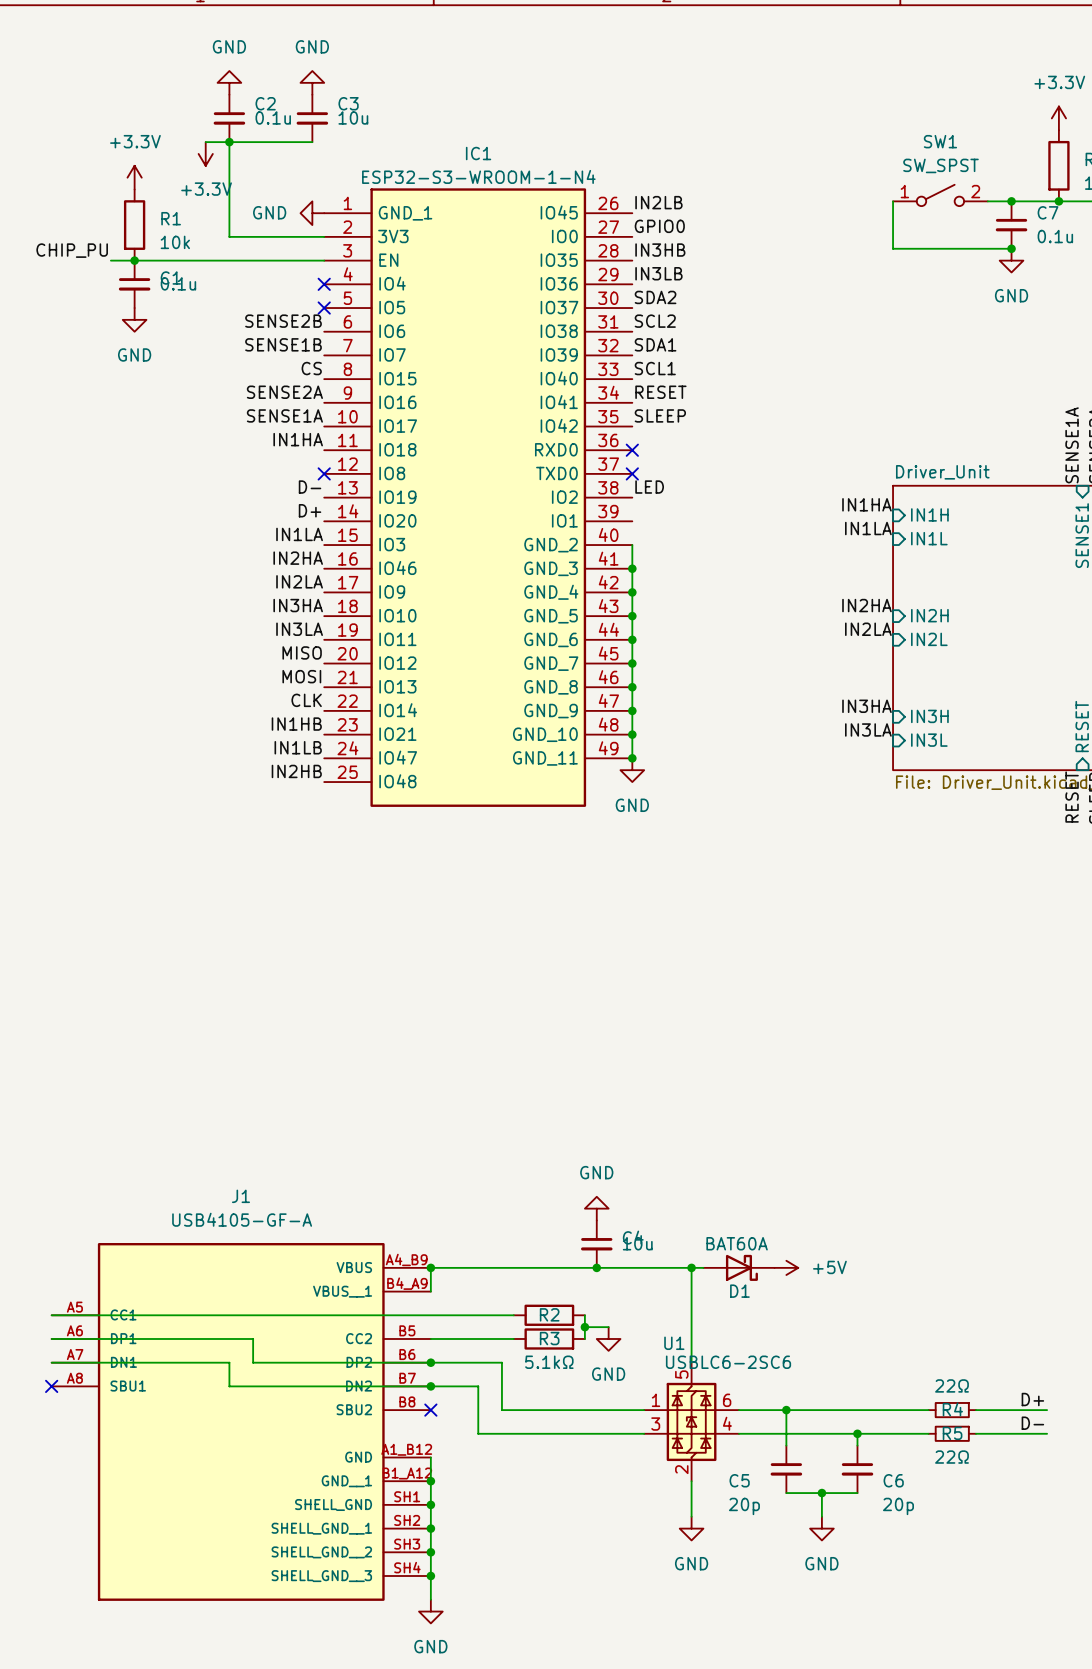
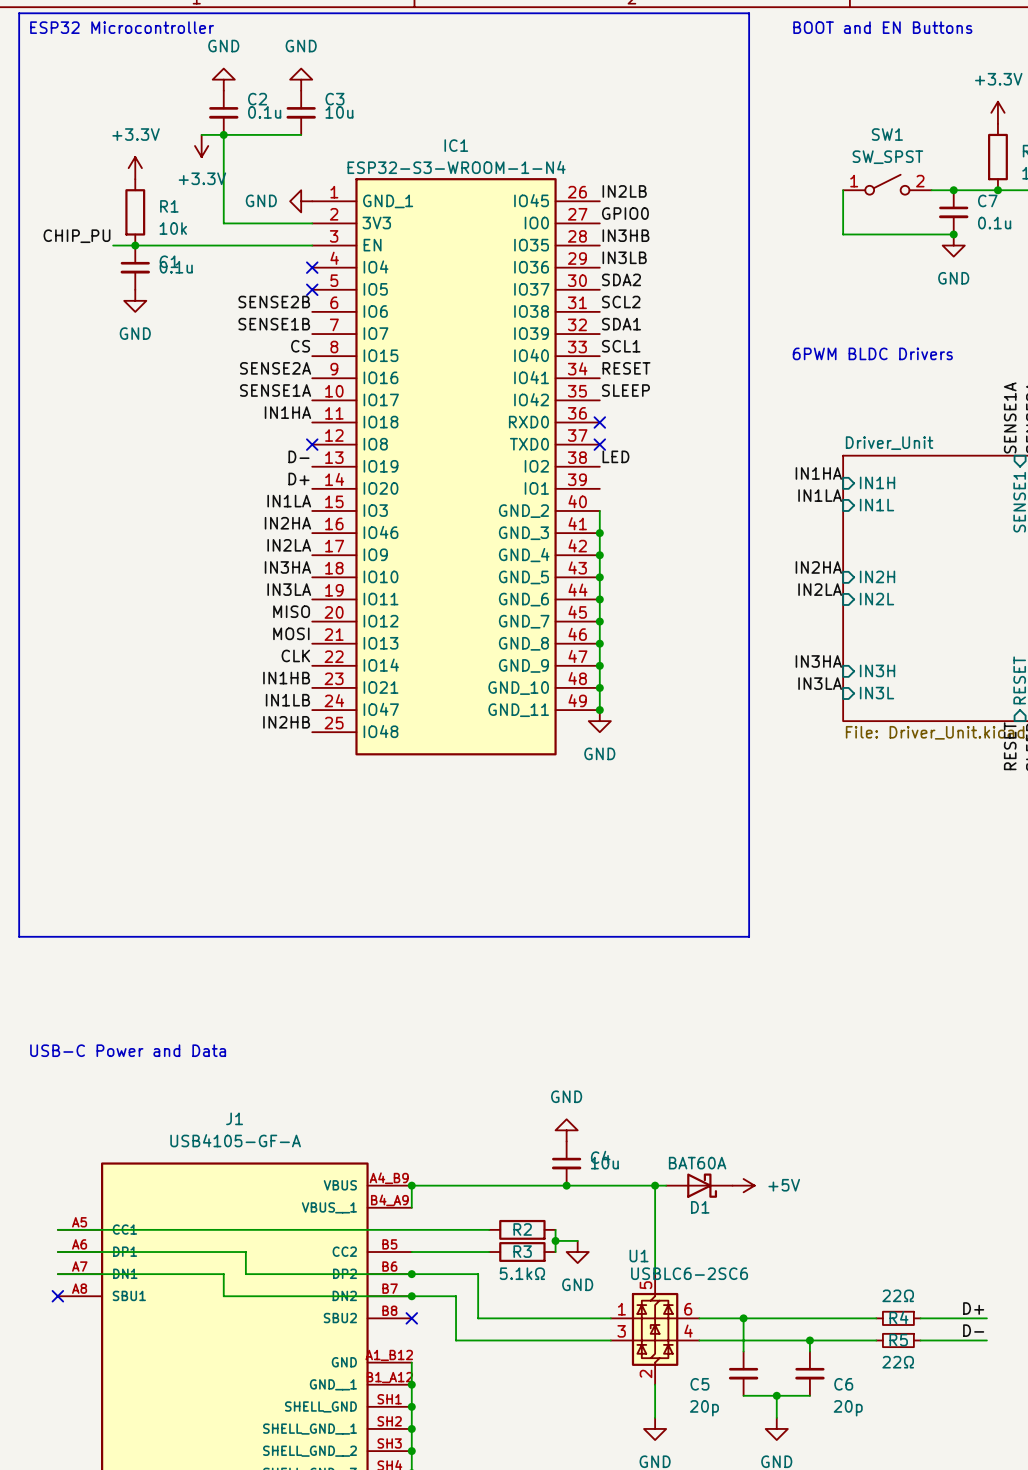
line: none -> (19, 13) (749, 13) (749, 936) (19, 936) (19, 13)
text: none -> ESP32 Microcontroller (122, 27)
text: none -> BOOT and EN Buttons (882, 27)
text: none -> 6PWM BLDC Drivers (872, 353)
text: none -> USB-C Power and Data (128, 1050)

